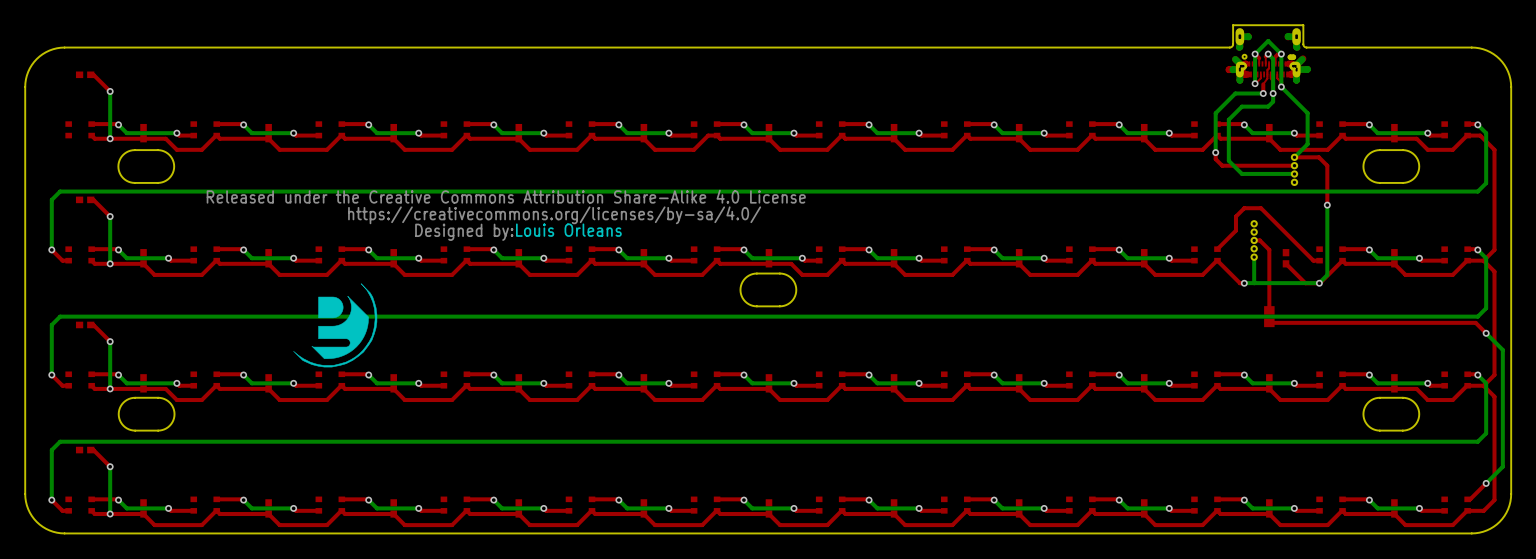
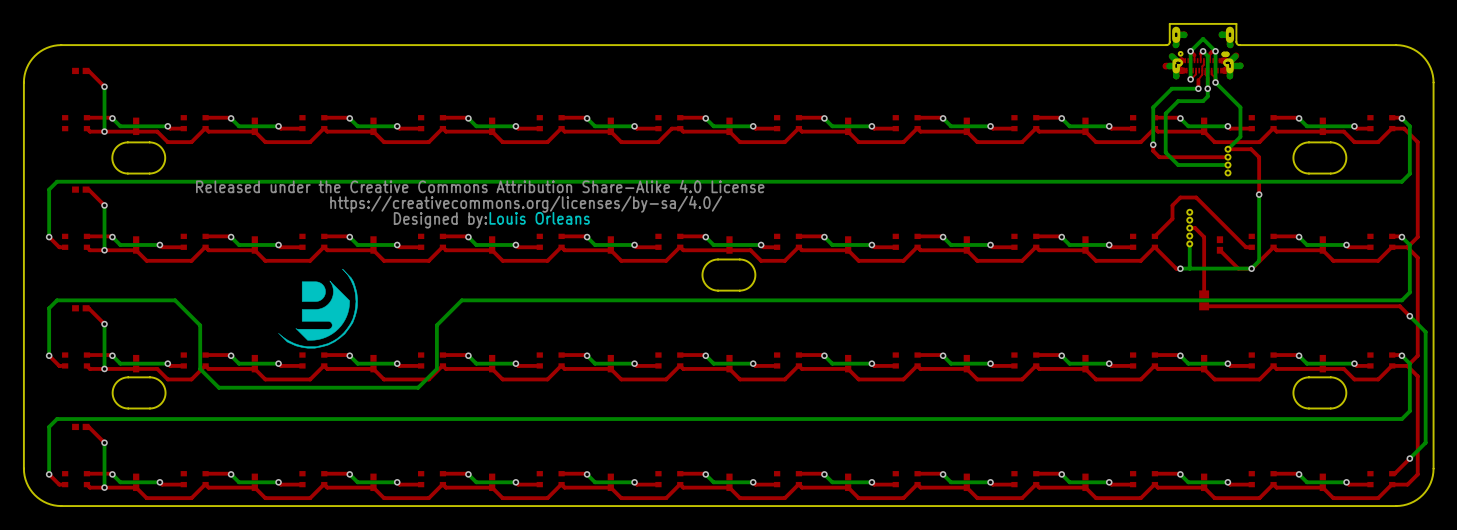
bottom track: (486, 316) (184, 316) -> (461, 300) (436, 325) (436, 369) (418, 387) (218, 387) (200, 369) (200, 325) (175, 300)

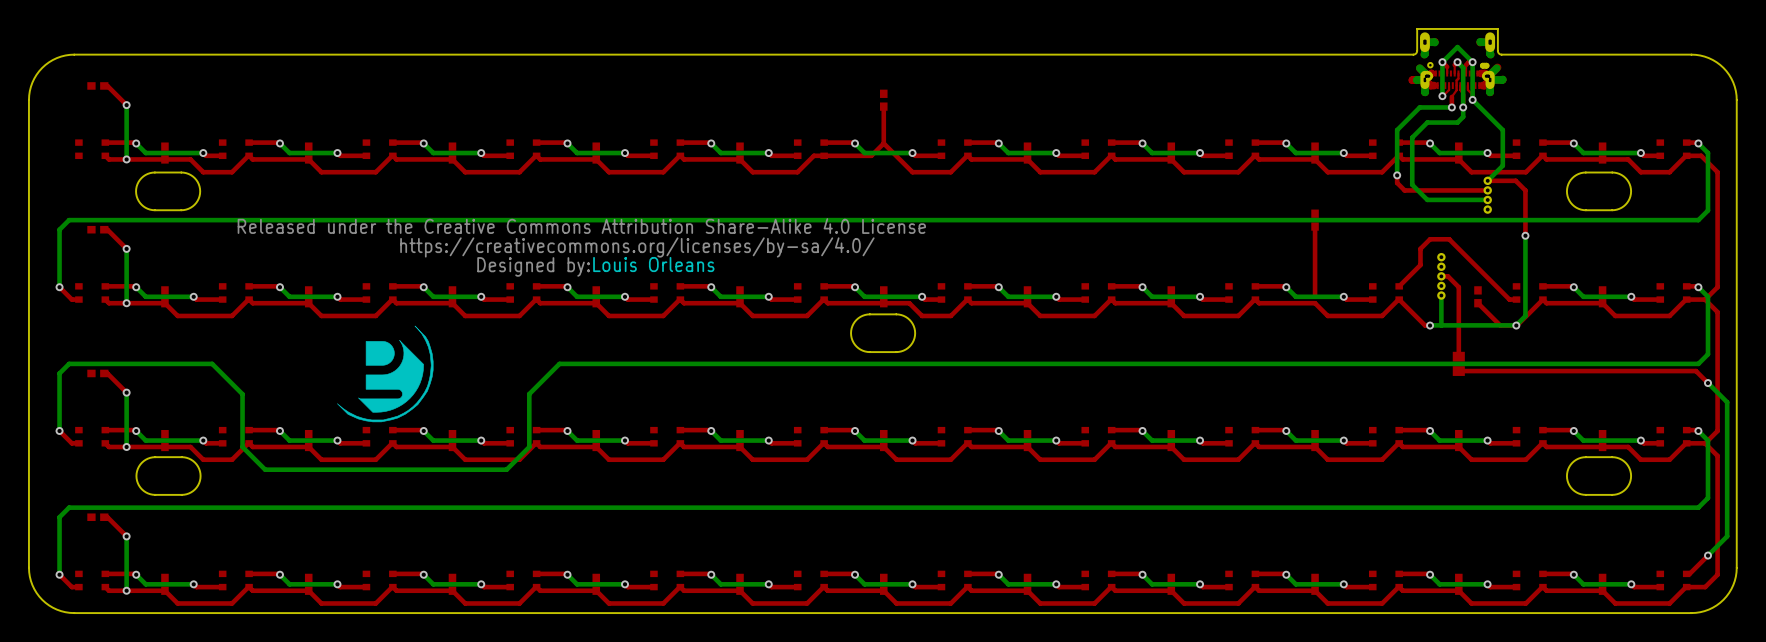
top track: none -> (883, 106) (883, 143)
top track: none -> (883, 143) (912, 172)
part position: (729, 126) -> (883, 100)
top track: (680, 128) (683, 131) (729, 131) (740, 142) (753, 142) -> (824, 155) (871, 155) (883, 143)
top track: none -> (1315, 226) (1315, 296)
part position: (1085, 244) -> (1315, 220)

